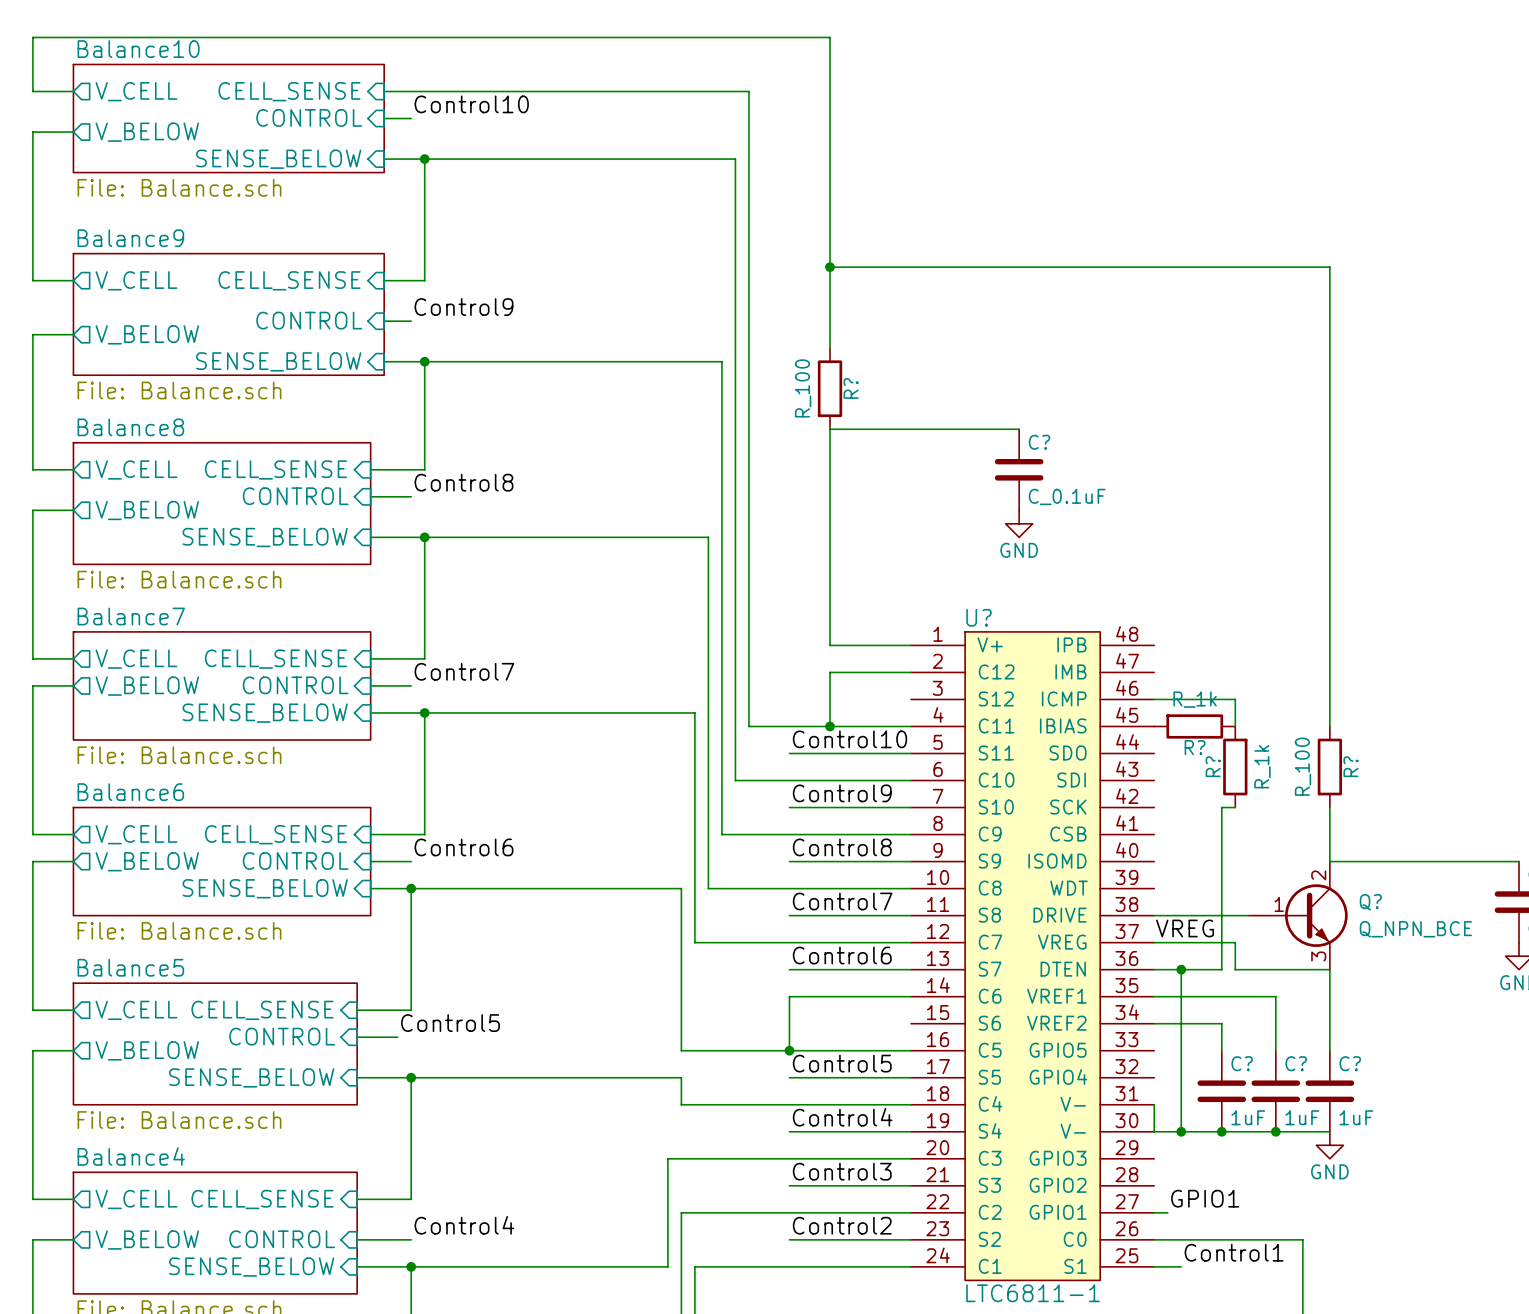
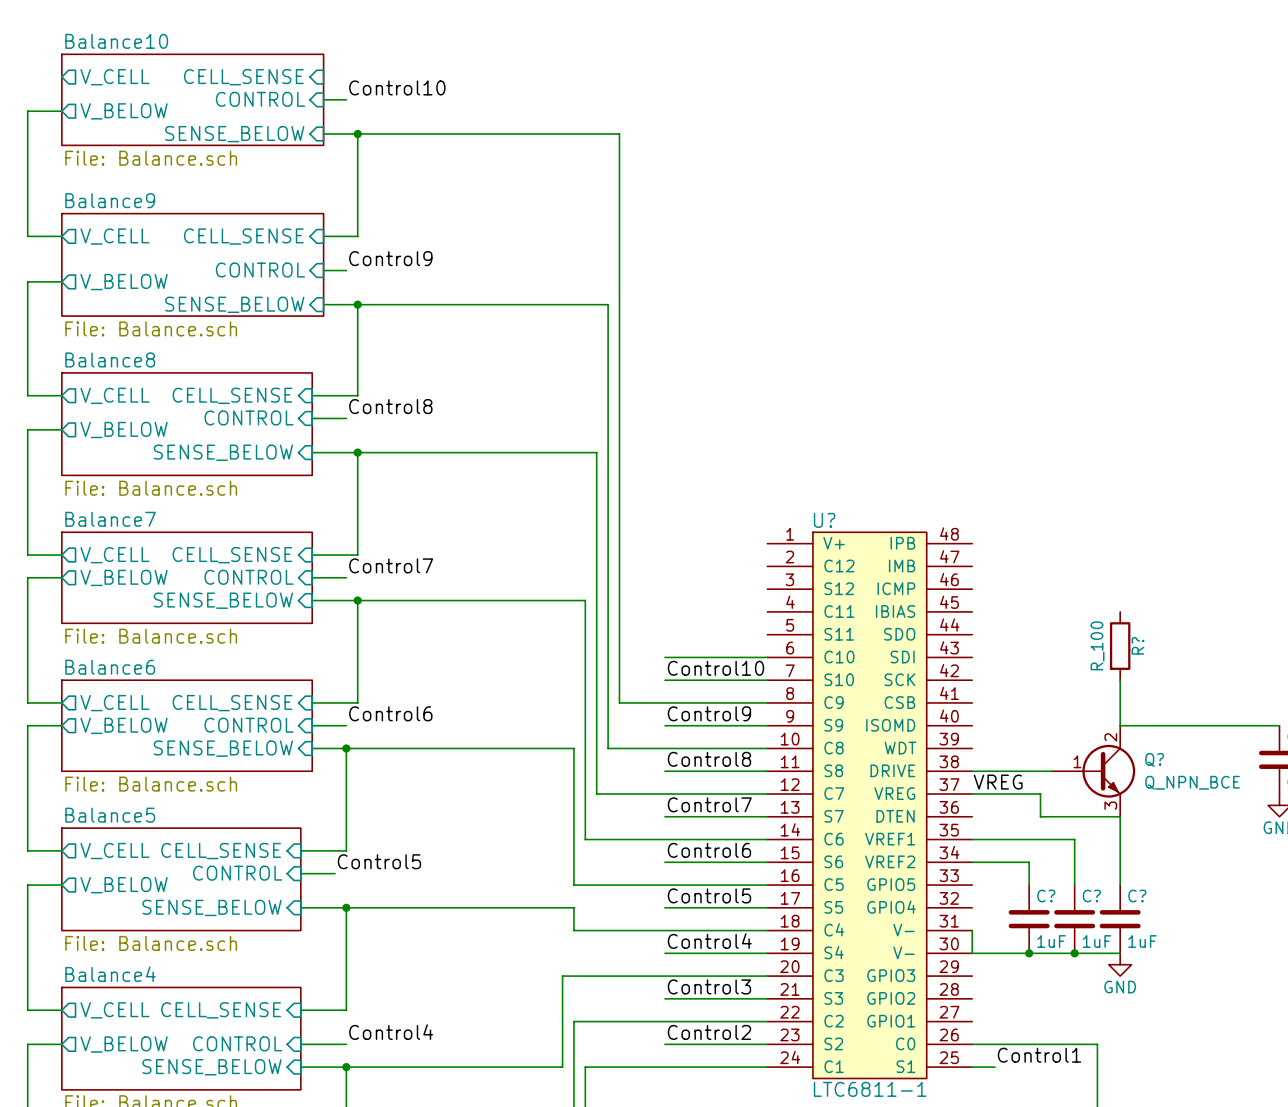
wire: (73, 91) (32, 91) (32, 37) (830, 37) (830, 348) -> none
wire: (384, 91) (748, 91) (748, 726) (911, 726) -> none
wire: (830, 267) (1329, 267) (1329, 726) -> none
junction: (830, 267) -> none
R?: R_100 (830, 388) -> none
wire: (1019, 429) (830, 429) (830, 645) (911, 645) -> none
C?: C_0.1uF (1019, 469) -> none
power symbol: GND (1019, 523) -> none
wire: (911, 672) (830, 672) (830, 726) -> none
wire: (1154, 699) (1235, 699) (1235, 726) -> none
junction: (830, 726) -> none
R?: R_1k (1194, 726) -> none
label: Control10 (849, 739) -> none
wire: (789, 753) (911, 753) -> none
R?: R_1k (1235, 767) -> none
wire: (735, 780) (789, 780) -> none
label: Control9 (842, 793) -> Control10 (715, 668)
wire: (1235, 807) (1221, 807) (1221, 969) (1154, 969) -> none
wire: (721, 834) (735, 834) -> (619, 657) (619, 702)
label: Control8 (842, 847) -> Control9 (709, 713)
wire: (708, 888) (721, 888) -> (608, 702) (608, 748)
label: Control7 (842, 901) -> Control8 (709, 759)
wire: (694, 942) (708, 942) -> (596, 748) (596, 794)
label: Control6 (842, 955) -> Control7 (709, 804)
wire: (1181, 969) (1181, 1131) -> none
junction: (1181, 969) -> none
wire: (789, 996) (789, 1050) -> (664, 839) (585, 839) (585, 794)
label: none -> Control6 (709, 850)
wire: none -> (664, 862) (767, 862)
junction: (789, 1050) -> none
junction: (1181, 1131) -> none
label: GPIO1 (1205, 1198) -> none
wire: (1154, 1212) (1167, 1212) -> none

